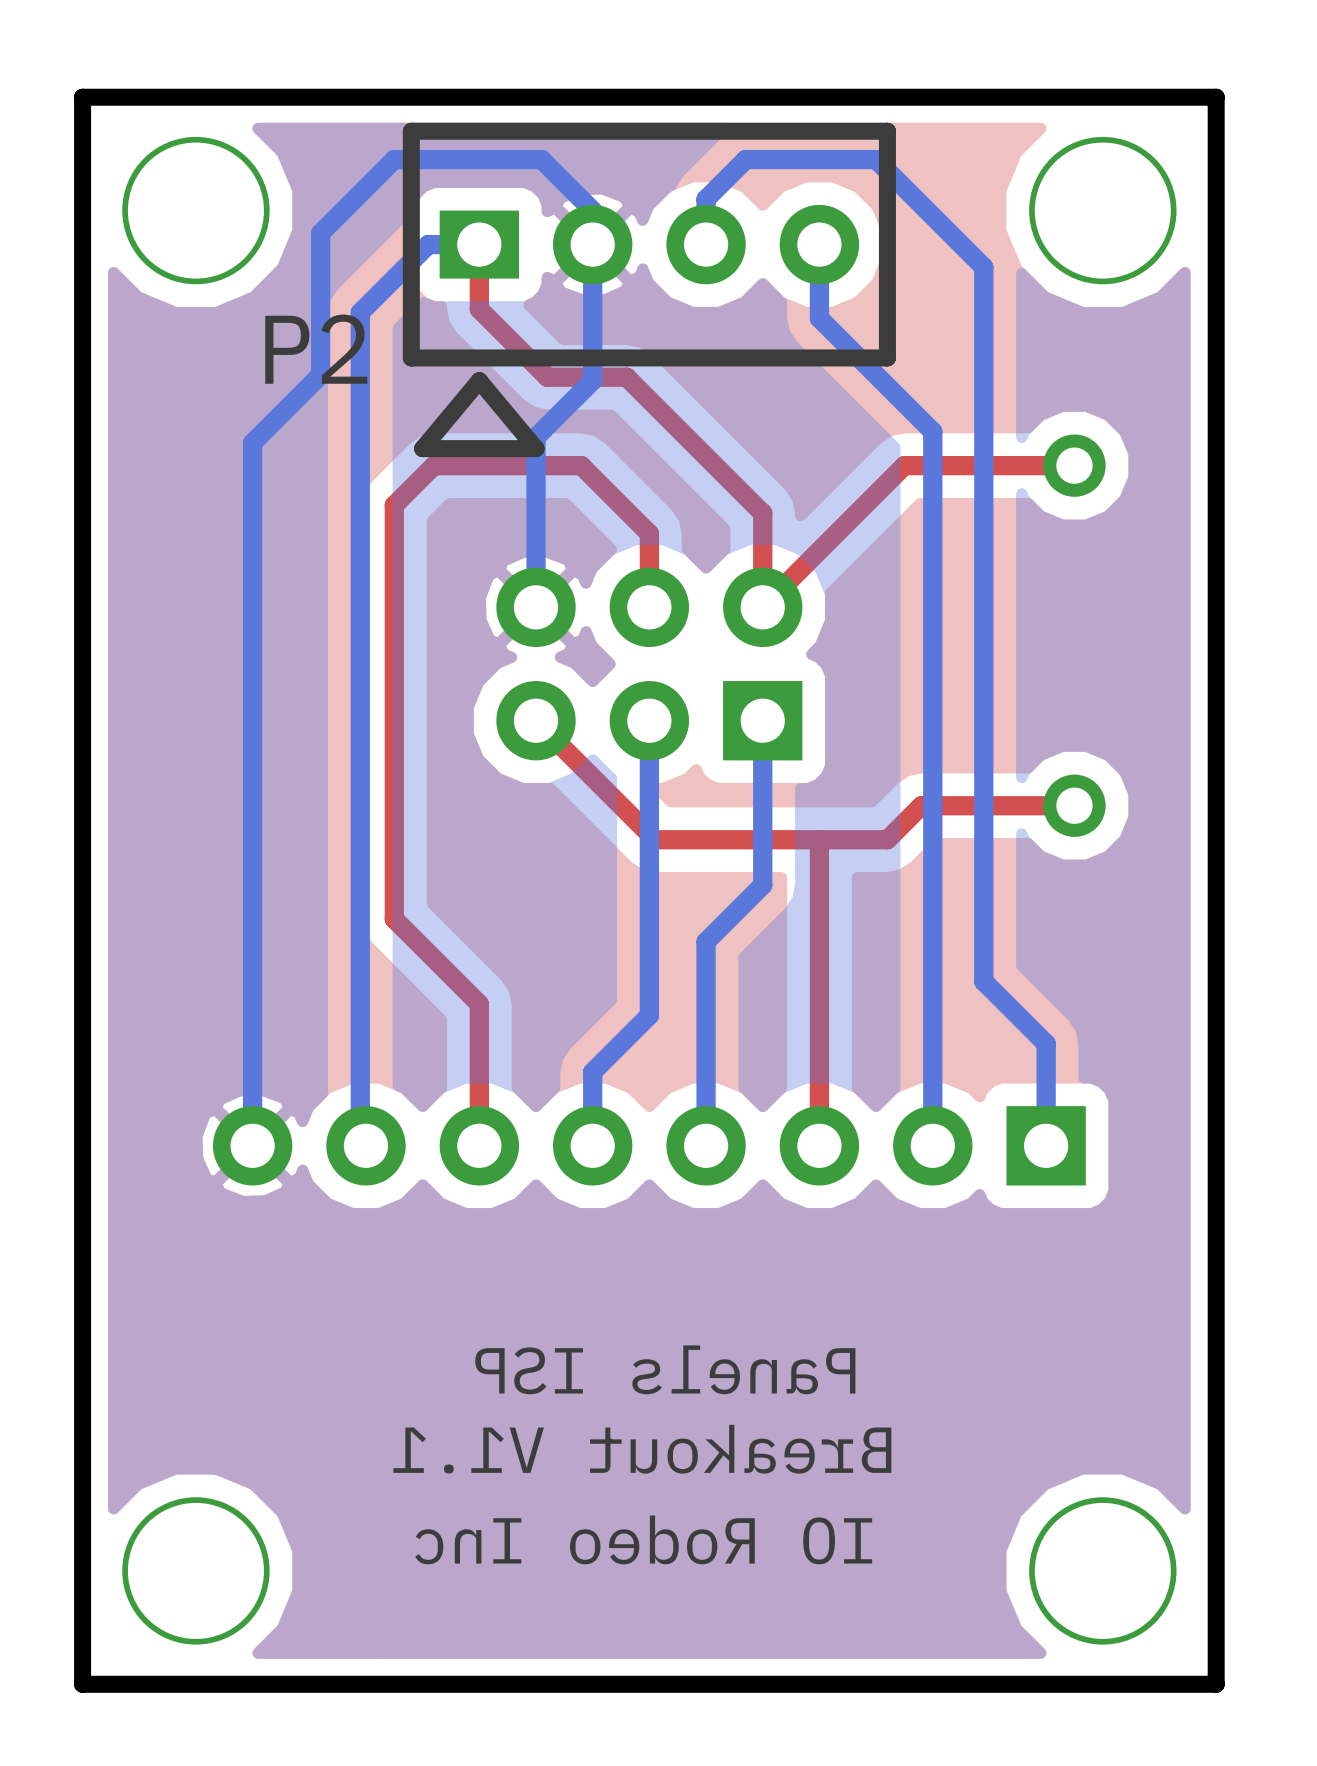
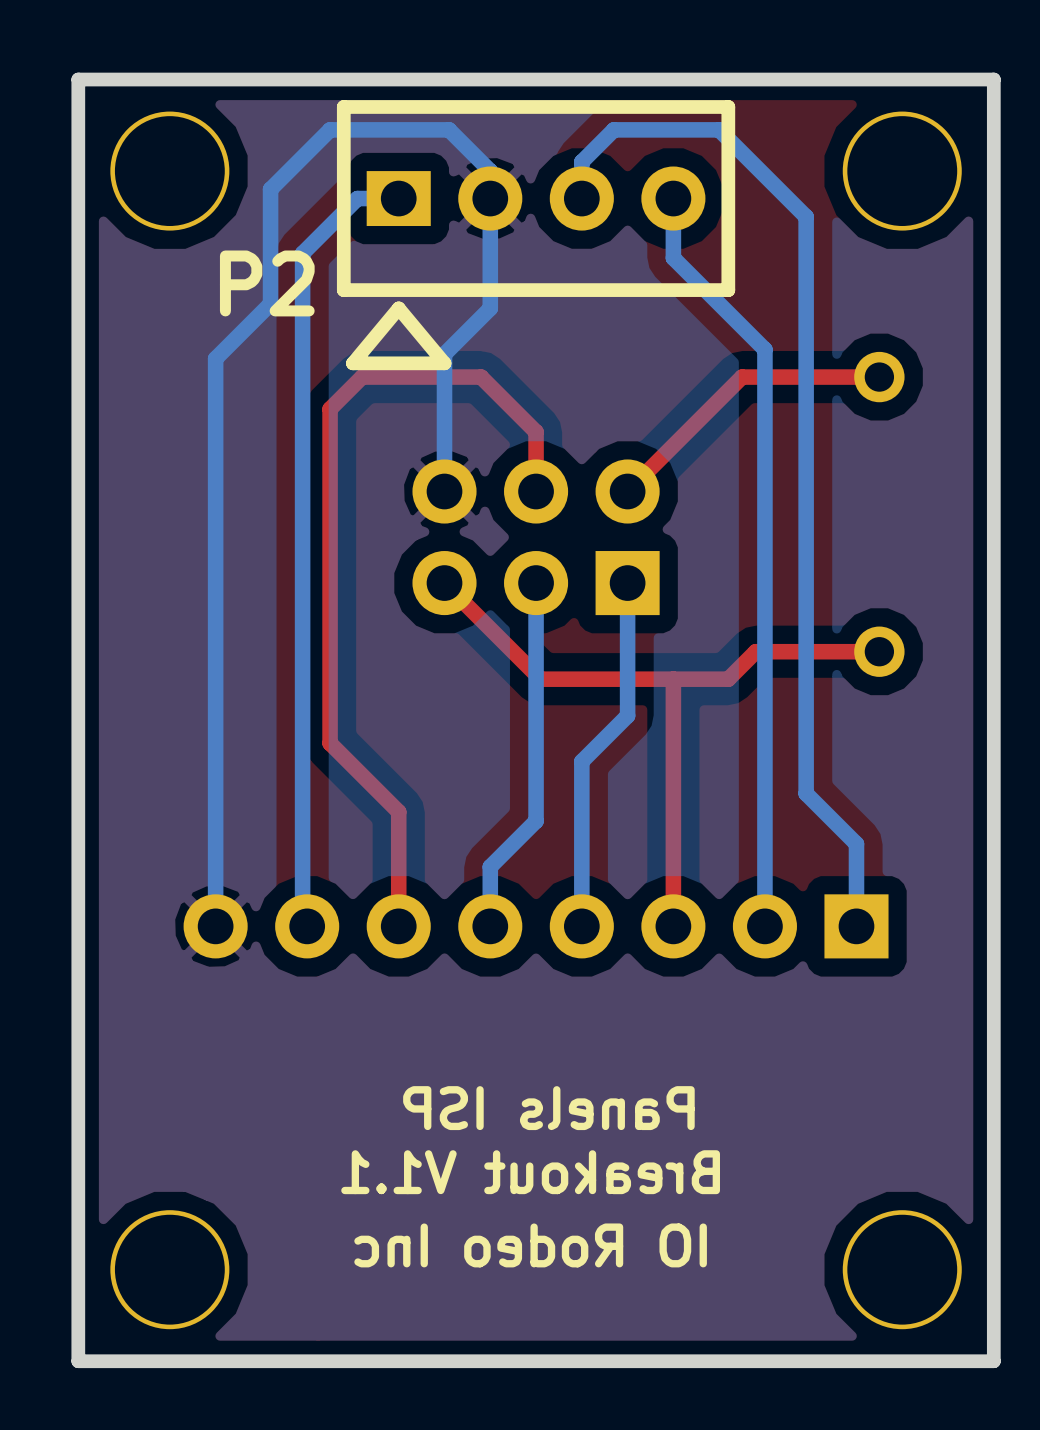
top track: (479, 244) (479, 309) (547, 377) (626, 377) (762, 513) (762, 607) -> none

